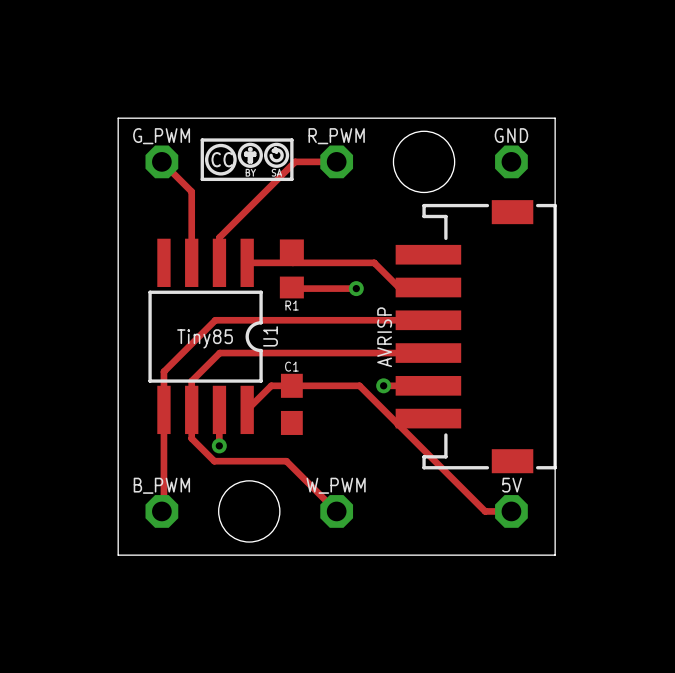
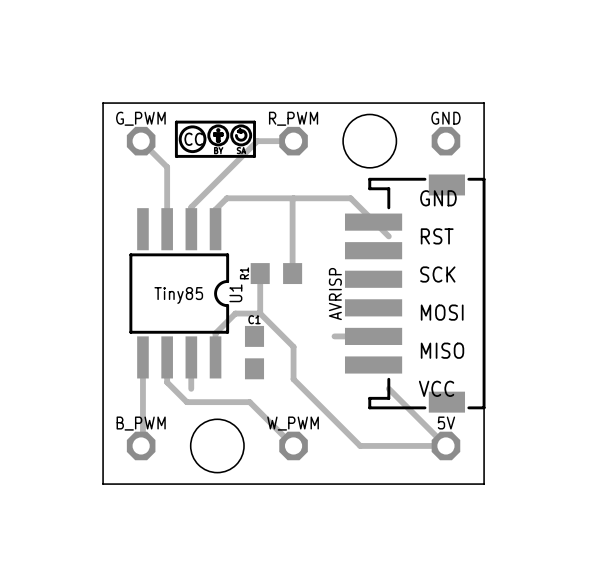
track: none -> (293, 198) (292, 273)
text: none -> GND (438, 198)
track: (247, 262) (374, 262) (398, 287) (428, 287) -> (215, 229) (215, 209) (226, 198) (350, 198) (388, 236)
R1 rotation: 0° (291, 268) -> 90° clockwise (276, 273)
R1 position: (291, 268) -> (276, 273)
text: none -> RST (437, 236)
track: (291, 287) (356, 288) -> none
via: (356, 288) -> none
track: none -> (260, 273) (260, 313)
text: none -> SCK (437, 274)
track: (428, 320) (215, 320) (163, 371) (163, 409) -> none
track: (428, 353) (219, 353) (191, 381) (191, 409) -> none
text: none -> MOSI (442, 312)
track: none -> (260, 313) (235, 313) (215, 333) (215, 357)
via: (383, 385) -> none
text: none -> MISO (442, 350)
track: (247, 409) (271, 385) (359, 385) (485, 511) -> (260, 313) (293, 346) (293, 379) (360, 445) (423, 445)
via: (219, 445) -> none
track: none -> (388, 388) (445, 445)
text: none -> VCC (436, 388)

